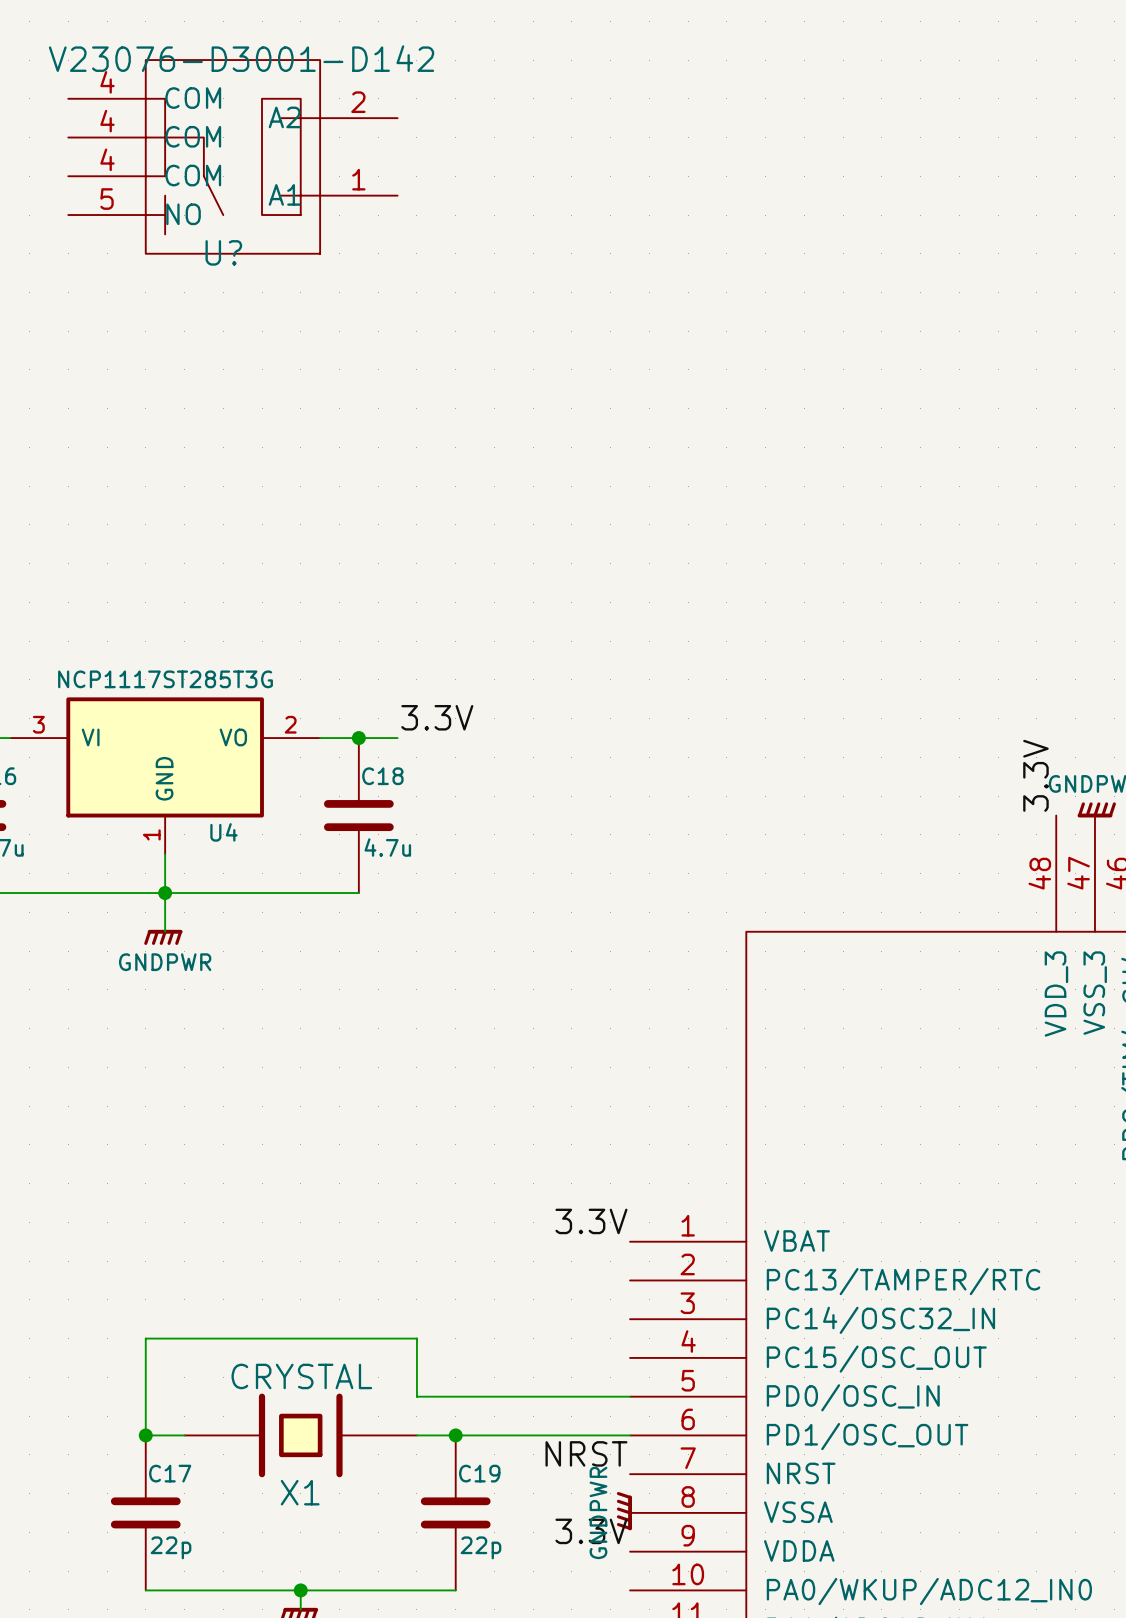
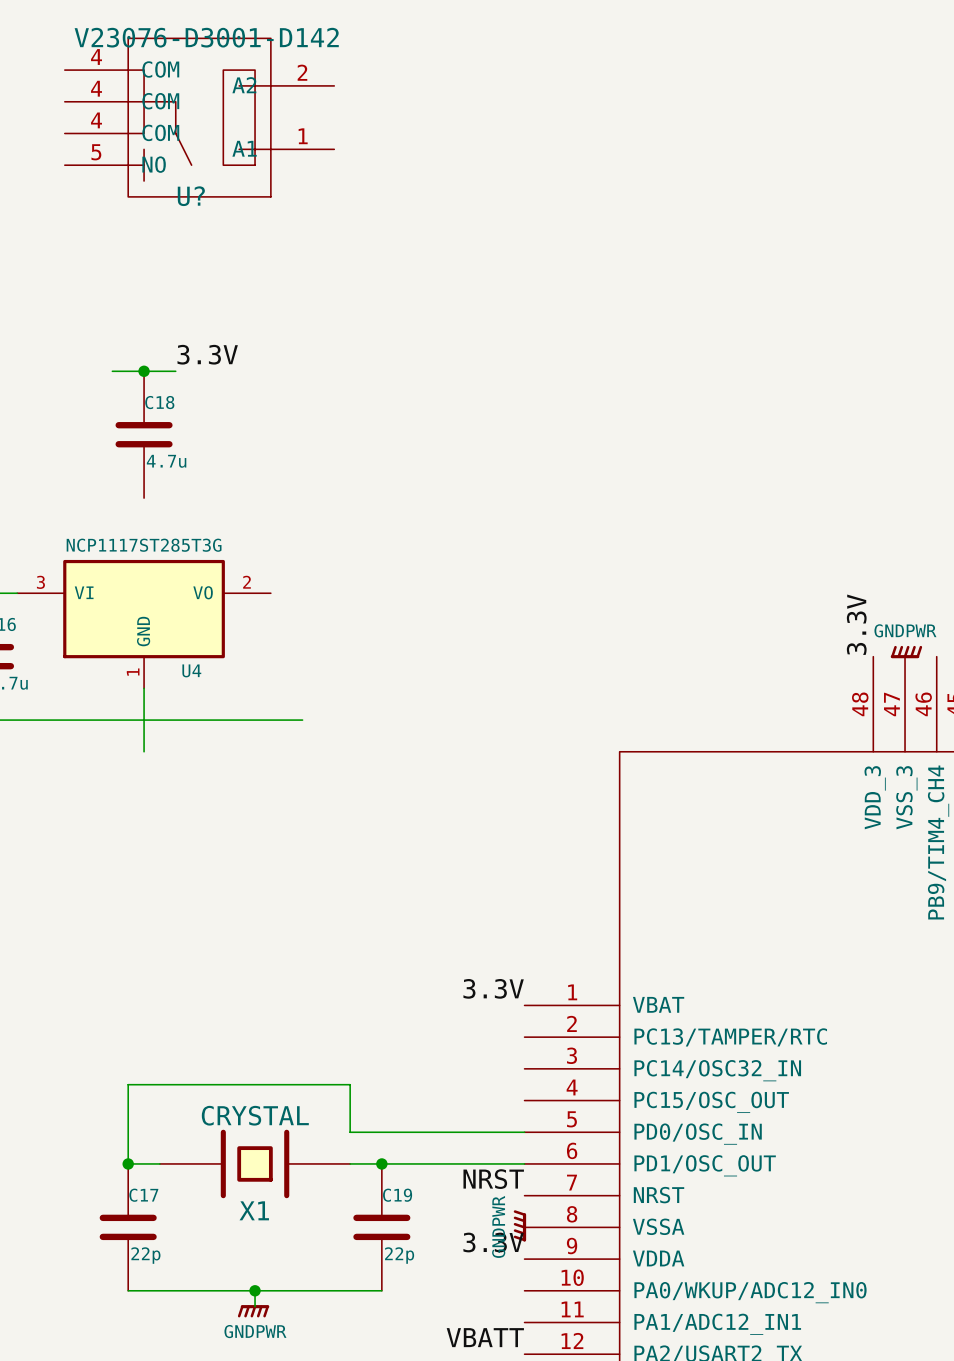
junction: none -> (144, 371)
label position: 3.3V (437, 717) -> 3.3V (207, 354)
wire: (320, 738) (397, 738) -> (112, 371) (175, 371)
junction: (358, 738) -> none
C18 position: (358, 815) -> (144, 434)
junction: (165, 893) -> none
power symbol: GNDPWR (163, 937) -> none

